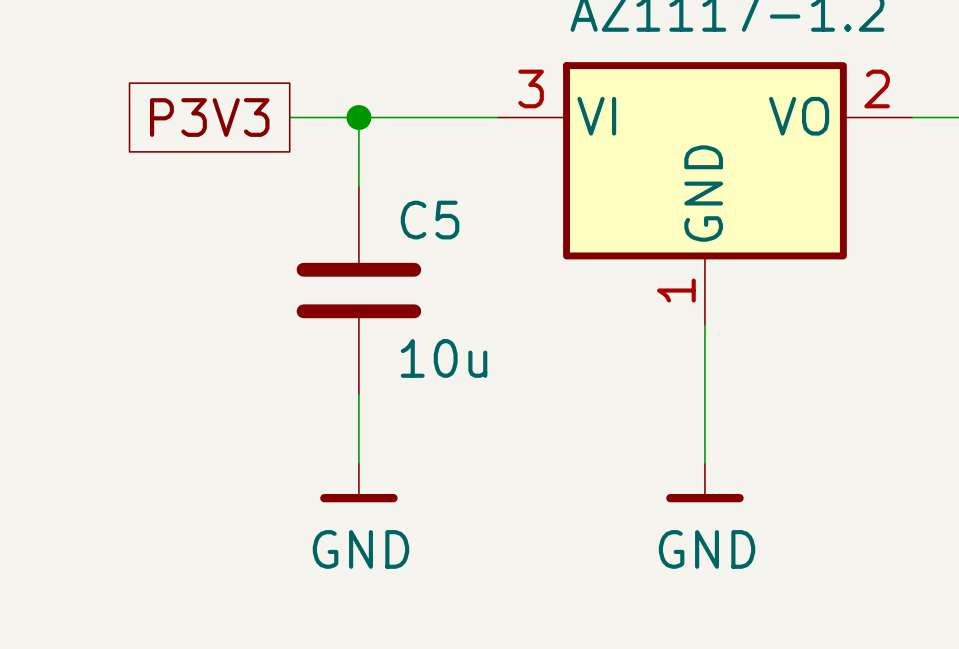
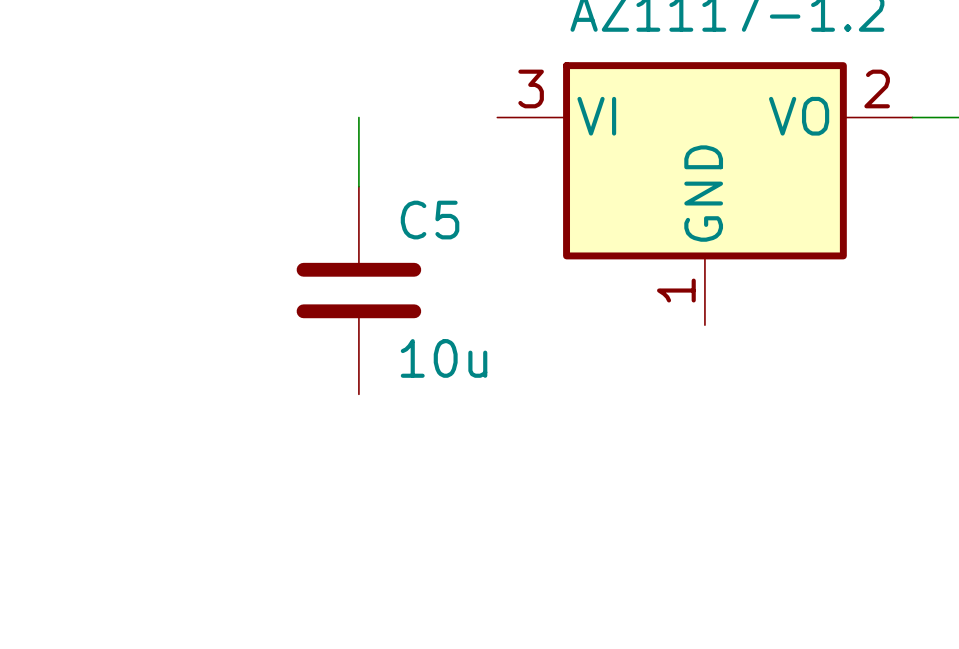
global label: P3V3 (209, 117) -> none
wire: (289, 117) (497, 117) -> none
junction: (358, 117) -> none
wire: (704, 325) (704, 463) -> none
wire: (358, 394) (358, 463) -> none
power symbol: GND (358, 482) -> none
power symbol: GND (704, 482) -> none

